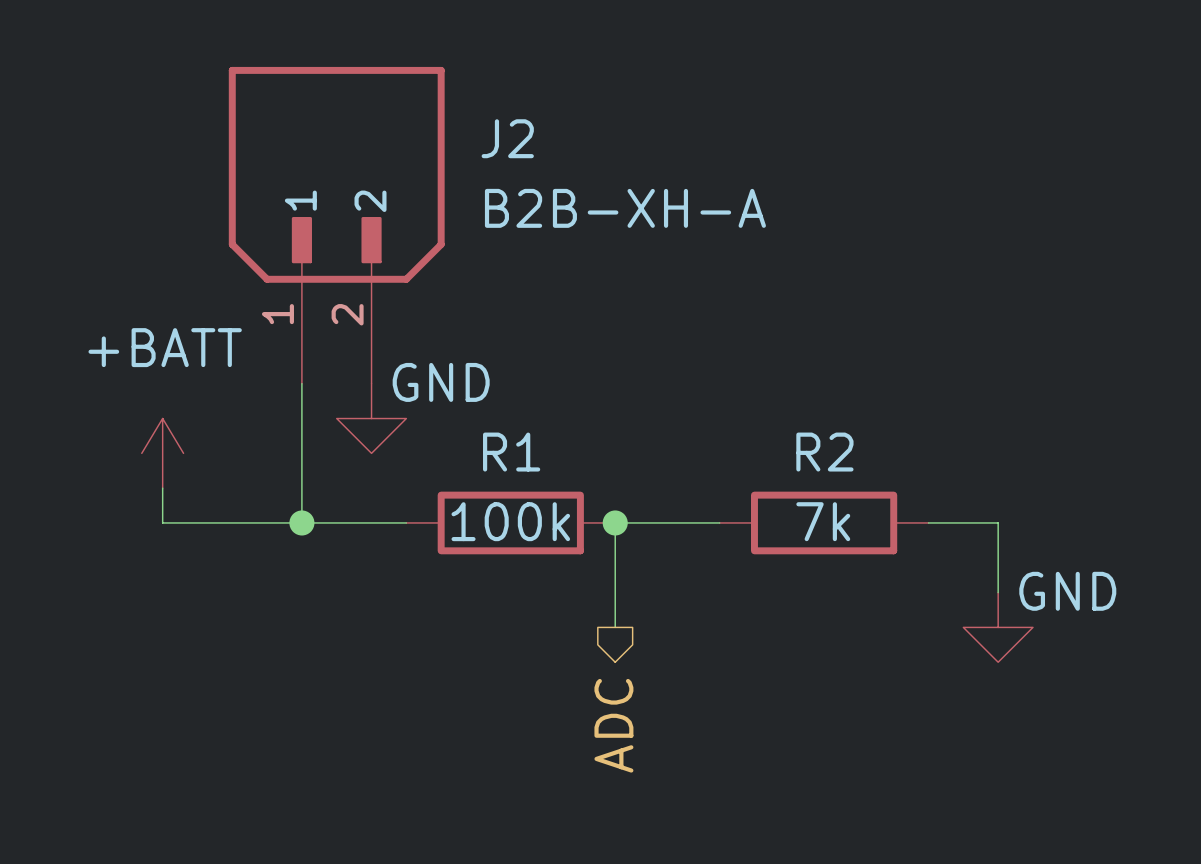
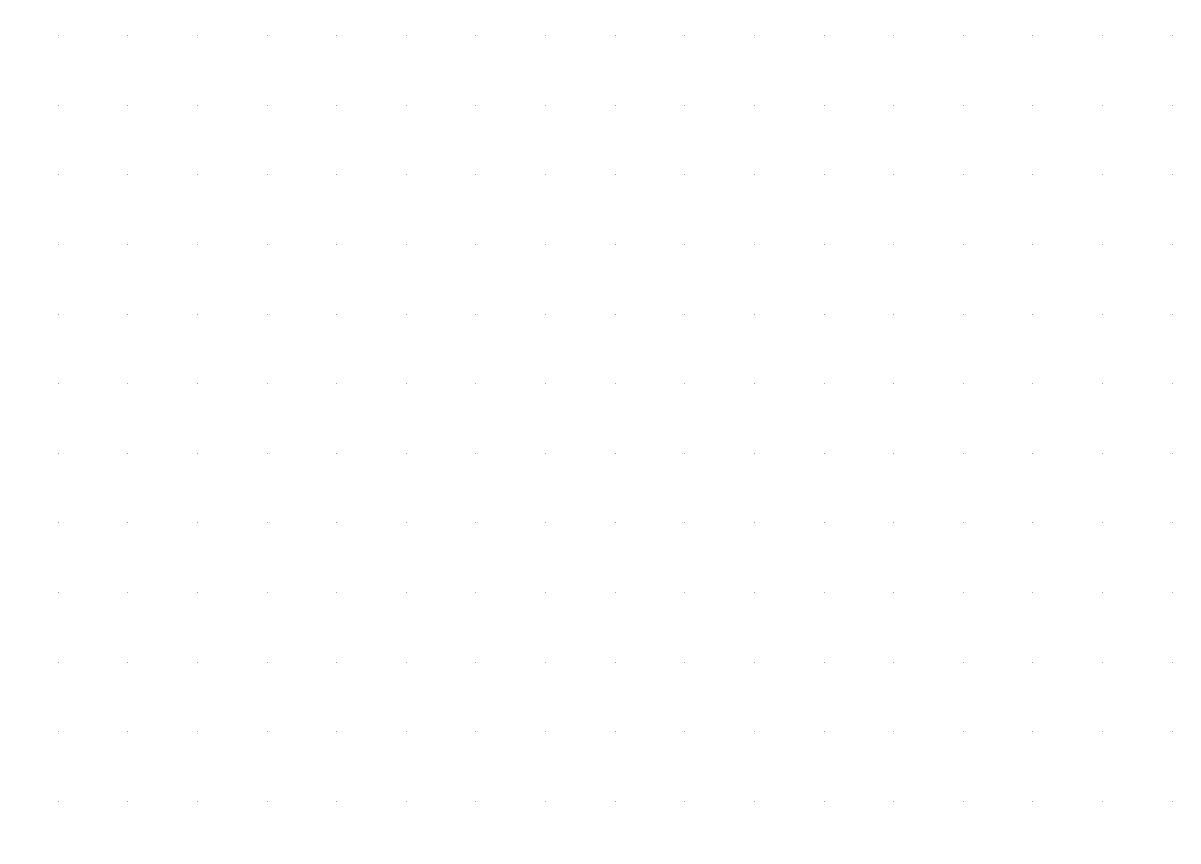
J2: B2B-XH-A (336, 225) -> none
wire: (301, 383) (301, 522) -> none
power symbol: GND (371, 418) -> none
power symbol: +BATT (162, 453) -> none
wire: (162, 488) (162, 522) (406, 522) -> none
junction: (301, 522) -> none
R1: 100k (510, 522) -> none
junction: (615, 522) -> none
wire: (719, 522) (615, 522) (615, 627) -> none
R2: 7k (824, 522) -> none
wire: (928, 522) (998, 522) (998, 592) -> none
power symbol: GND (998, 627) -> none
hierarchical label: ADC (613, 725) -> none

